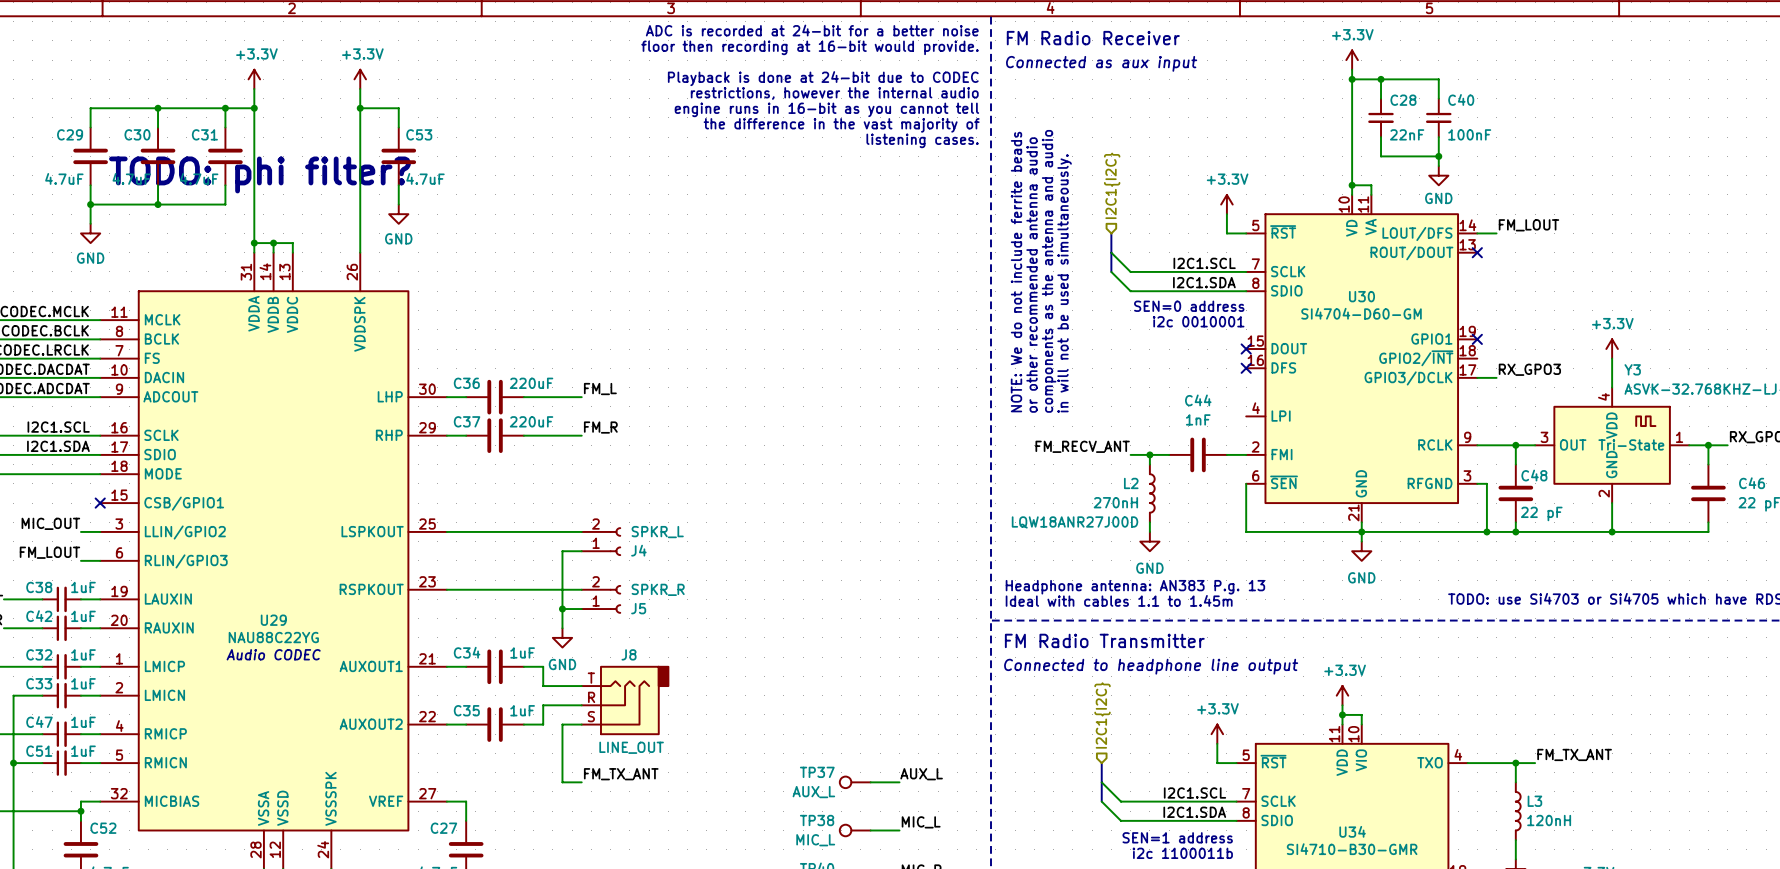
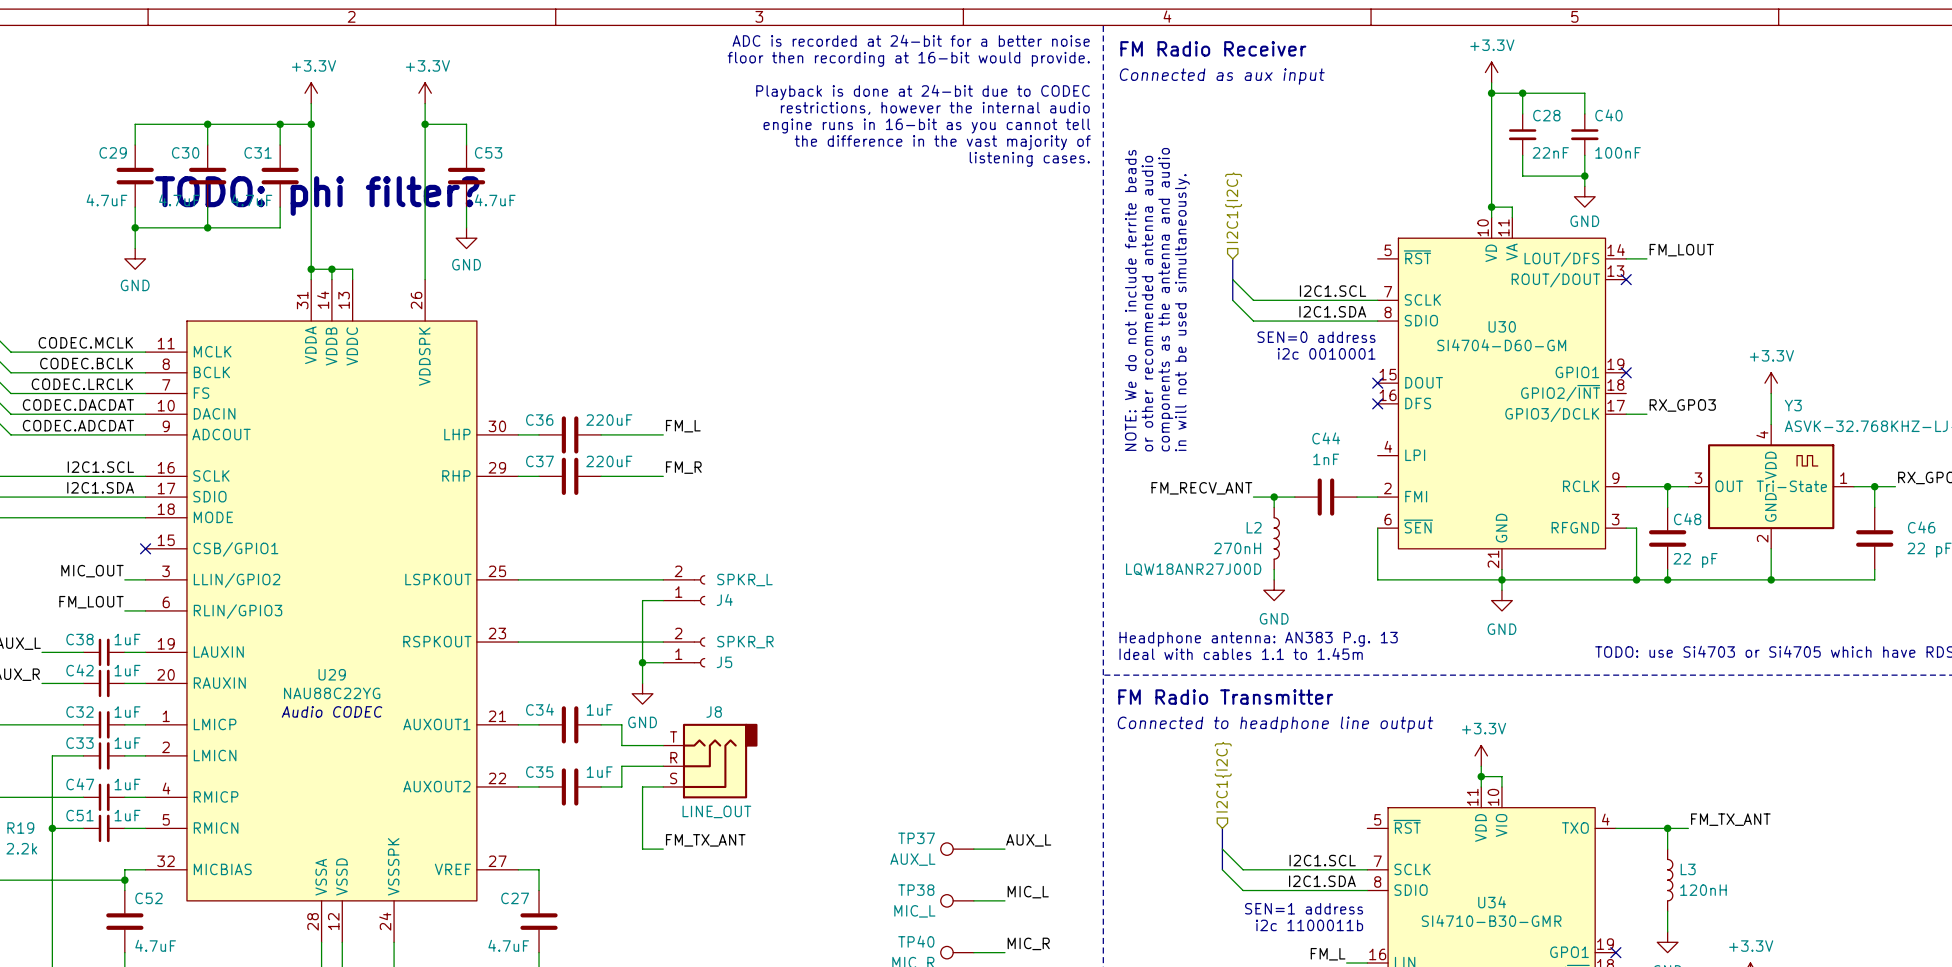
power symbol: +3.3V (1226, 204) -> none
wire: (1226, 214) (1226, 233) (1246, 233) -> none
power symbol: +3.3V (1217, 734) -> none
wire: (1217, 743) (1217, 763) (1236, 763) -> none

